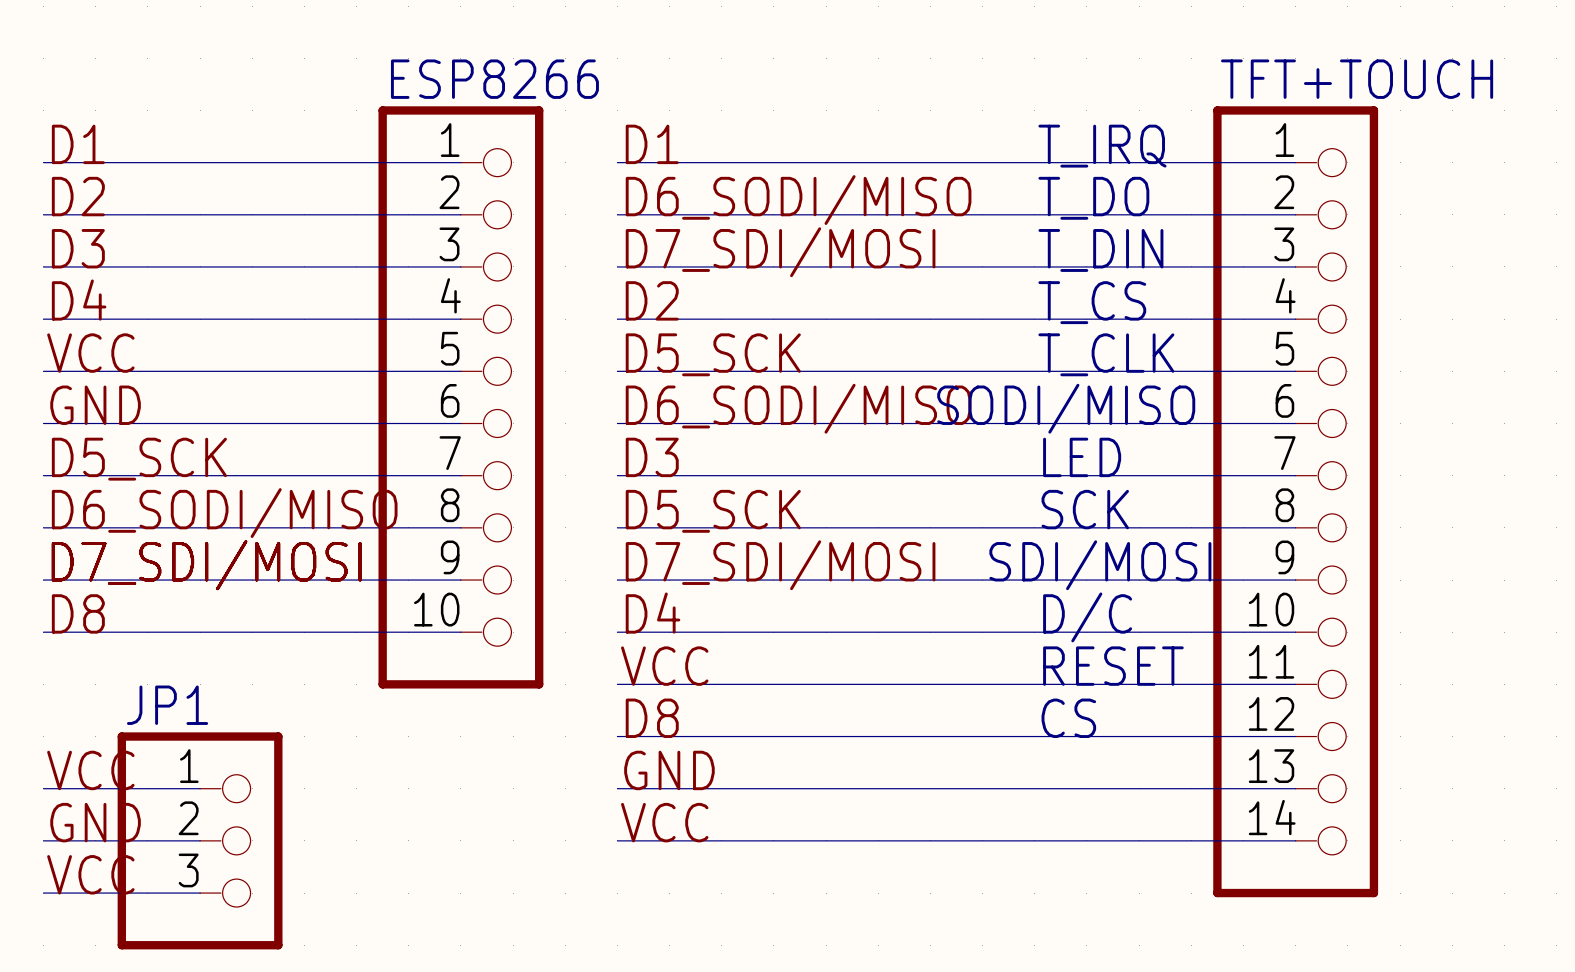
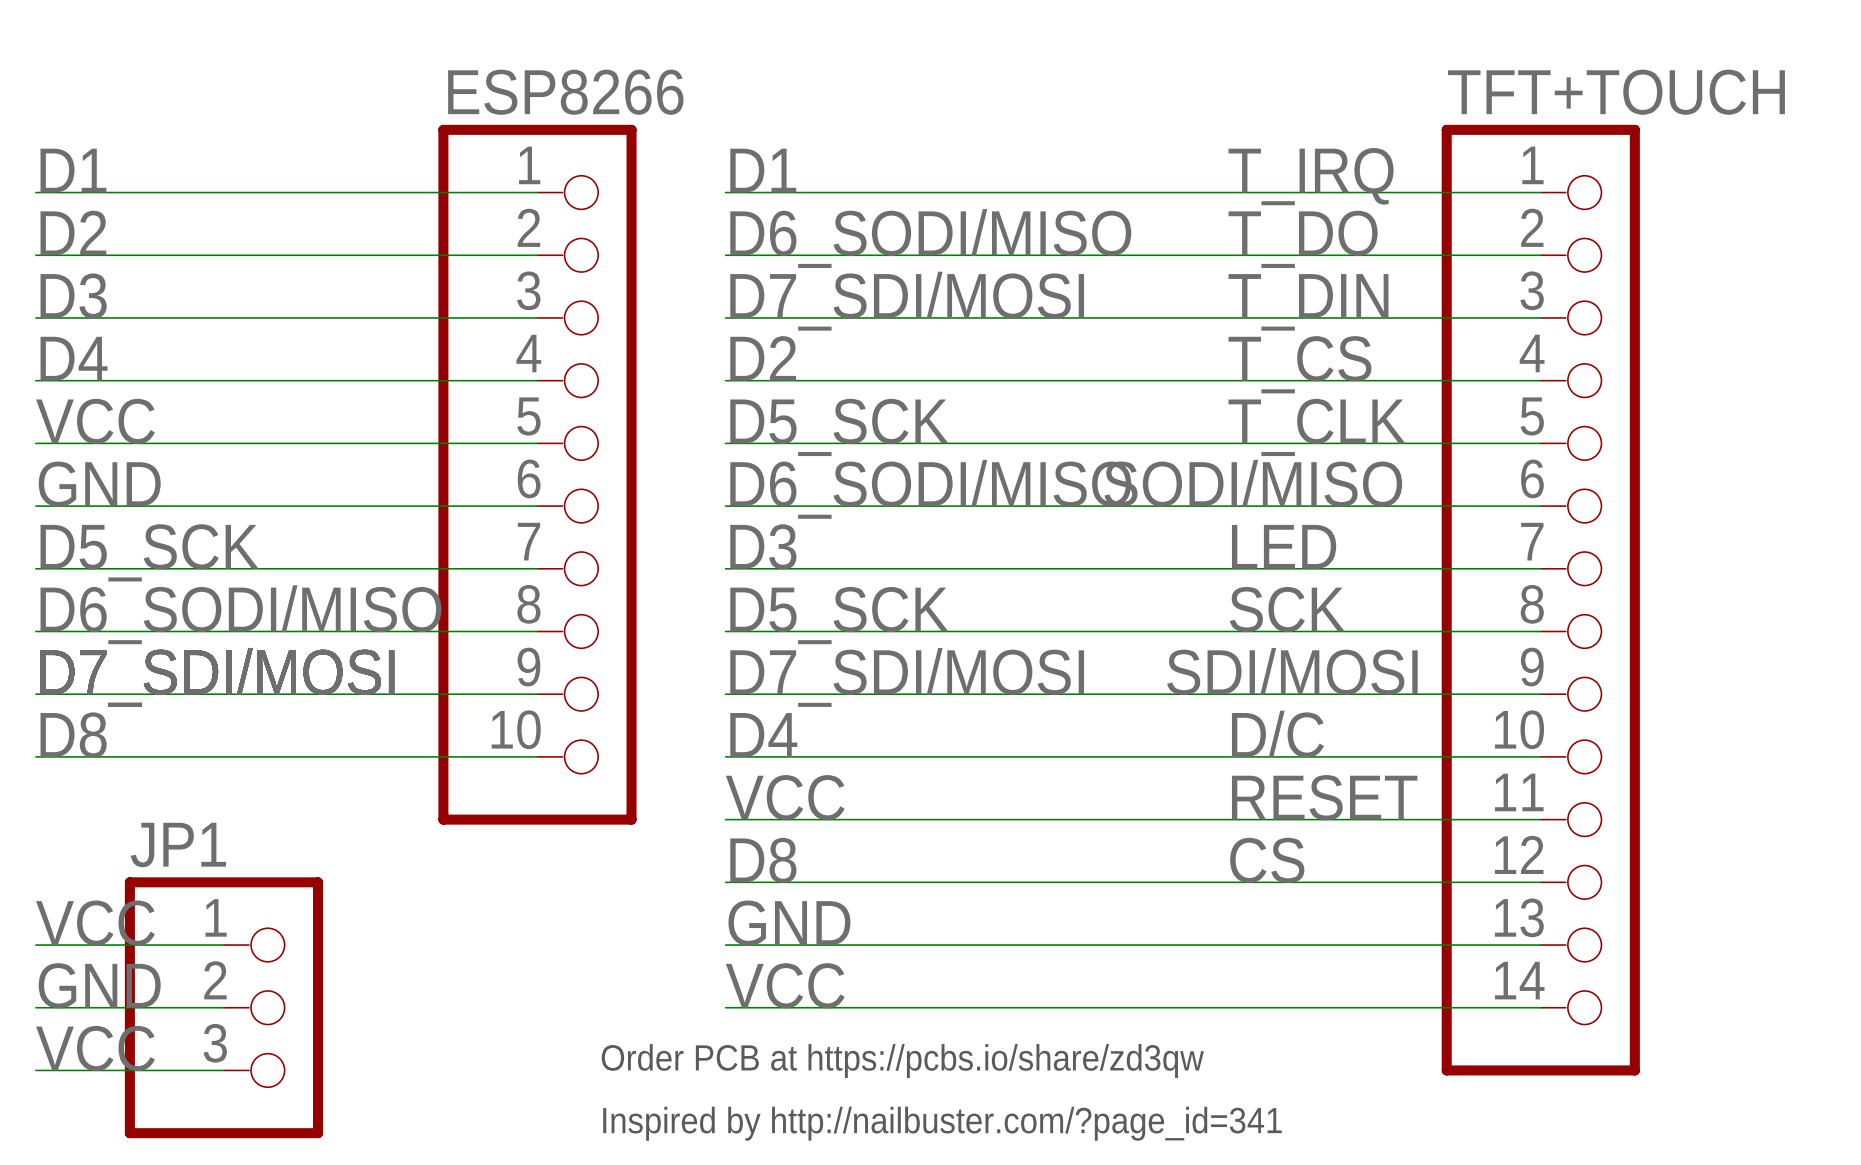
text: none -> Order PCB at https://pcbs.io/share/zd3qw (902, 1061)
text: none -> Inspired by http://nailbuster.com/?page_id=341 (942, 1123)

